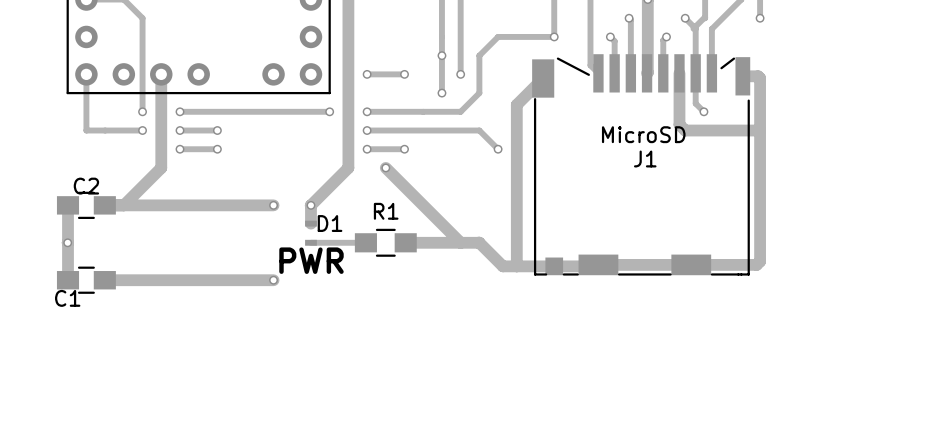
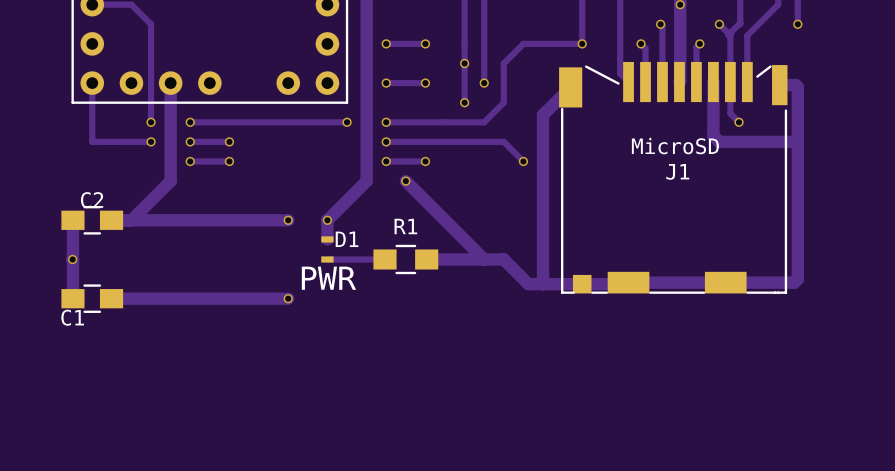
track: none -> (386, 43) (425, 43)
via: none -> (386, 43)
via: none -> (425, 43)

